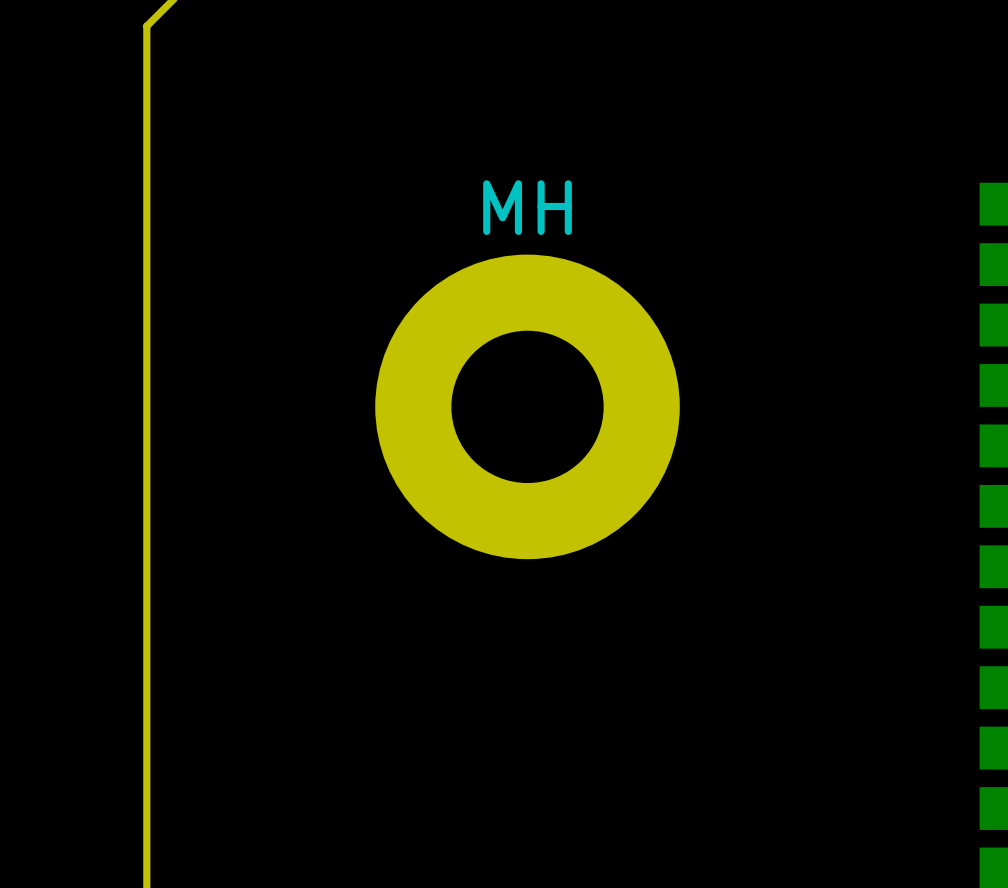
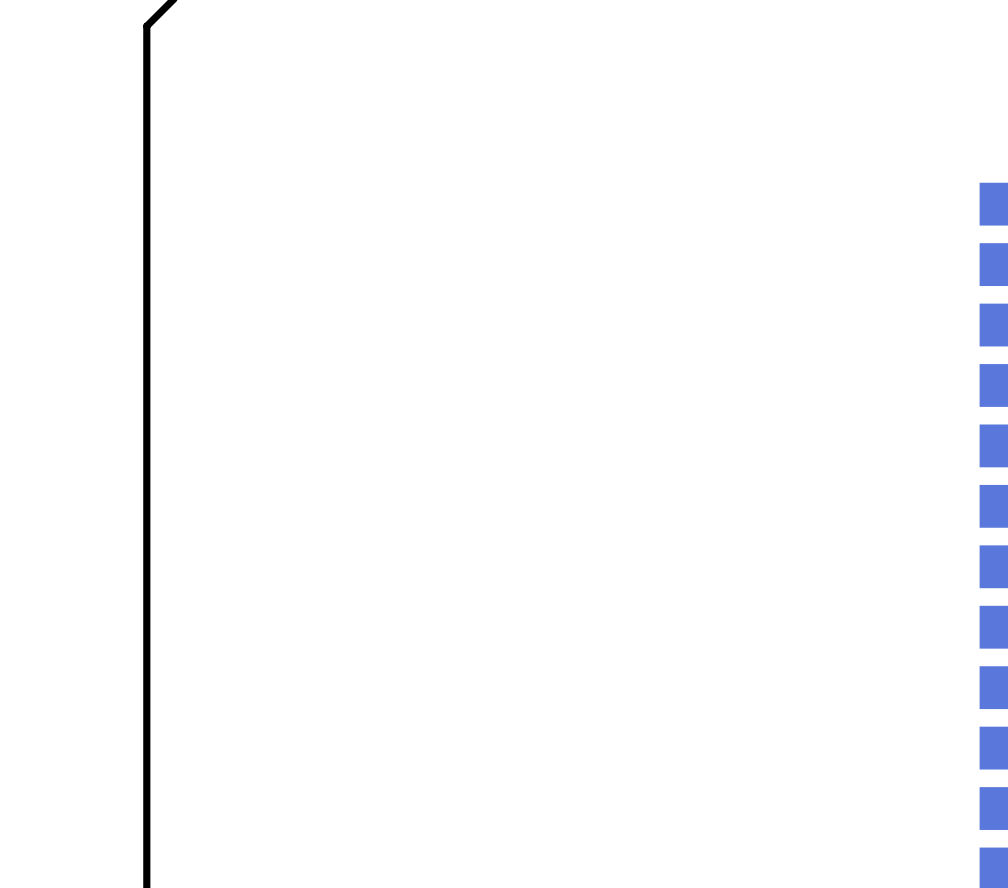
MH: (527, 406) -> none

